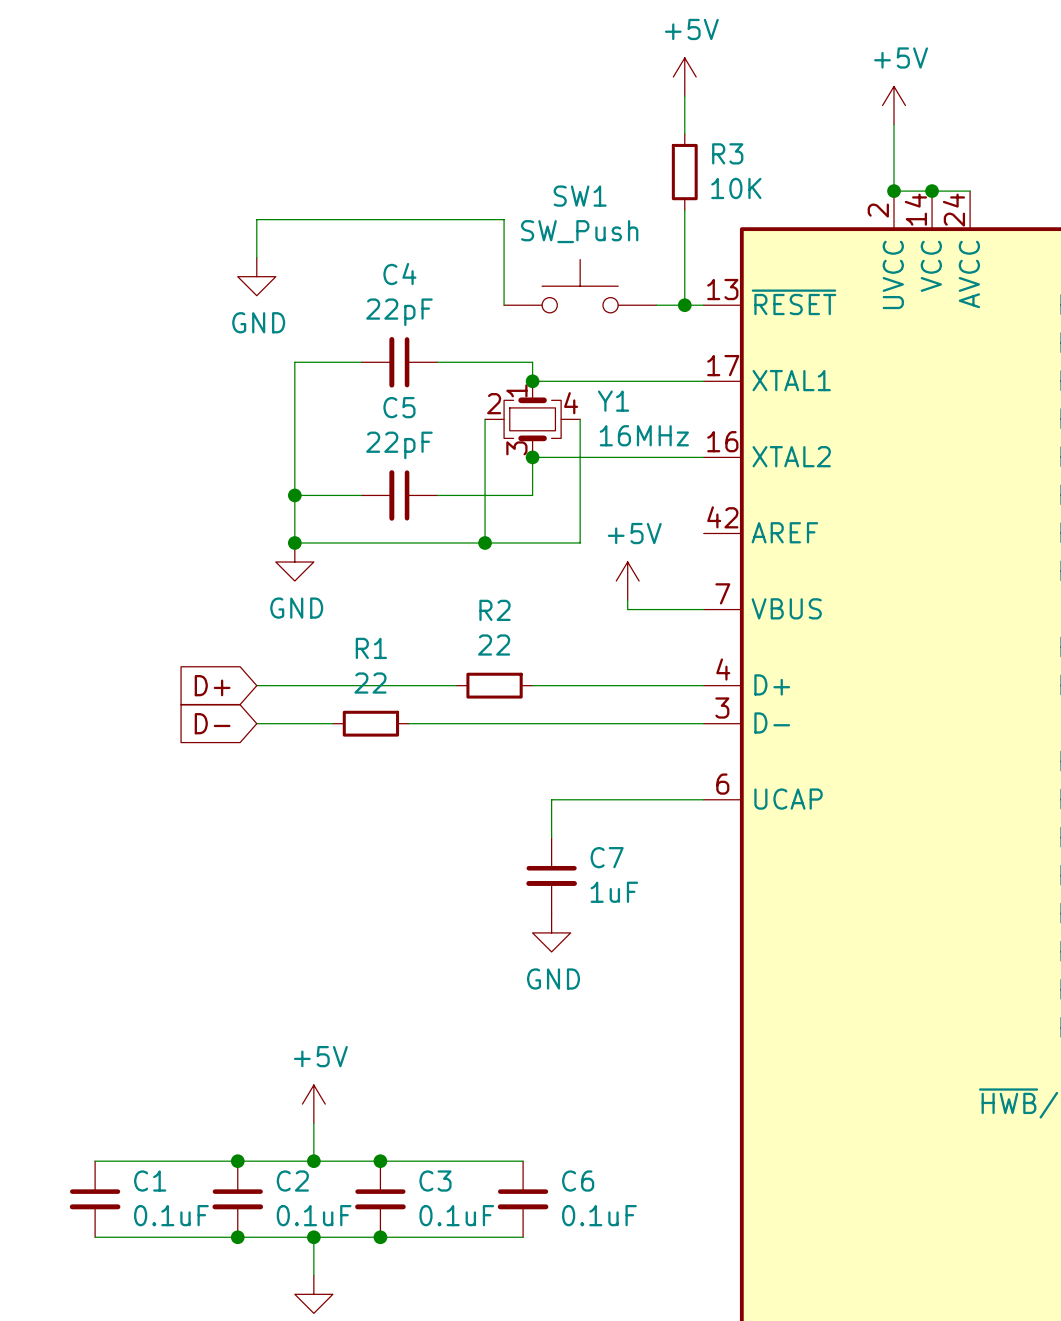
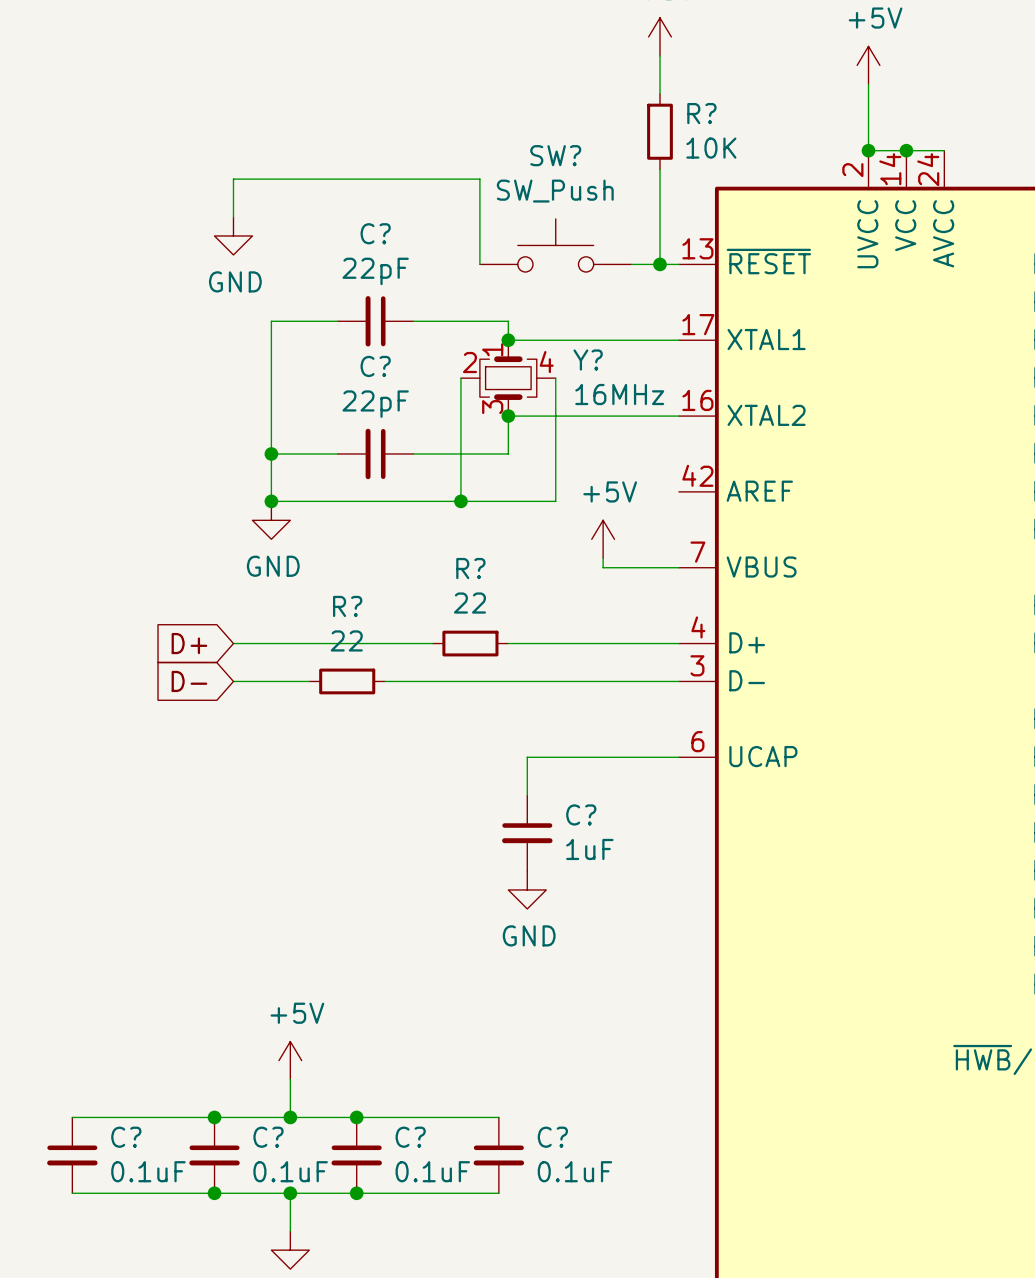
R3 name: R3 (727, 153) -> R? (701, 113)
SW1 name: SW1 (580, 196) -> SW? (555, 155)
C4 name: C4 (399, 274) -> C? (375, 233)
Y1 name: Y1 (613, 401) -> Y? (588, 360)
C5 name: C5 (399, 407) -> C? (375, 366)
R2 name: R2 (495, 610) -> R? (470, 568)
R1 name: R1 (371, 648) -> R? (347, 606)
C7 name: C7 (607, 857) -> C? (581, 814)
C1 name: C1 (150, 1181) -> C? (126, 1137)
C2 name: C2 (292, 1181) -> C? (268, 1137)
C3 name: C3 (435, 1181) -> C? (410, 1137)
C6 name: C6 (578, 1181) -> C? (552, 1137)

